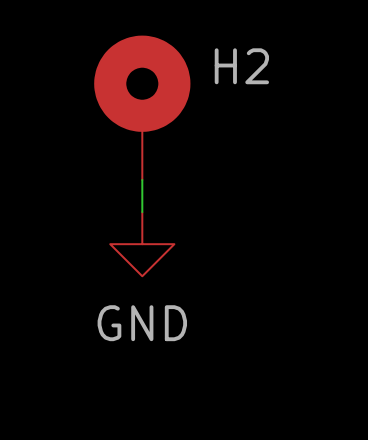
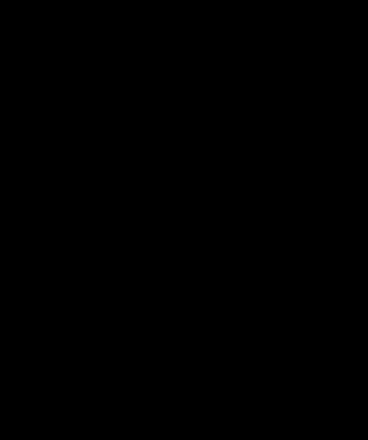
H2: (142, 107) -> none
wire: (142, 179) (142, 212) -> none
power symbol: GND (142, 244) -> none

